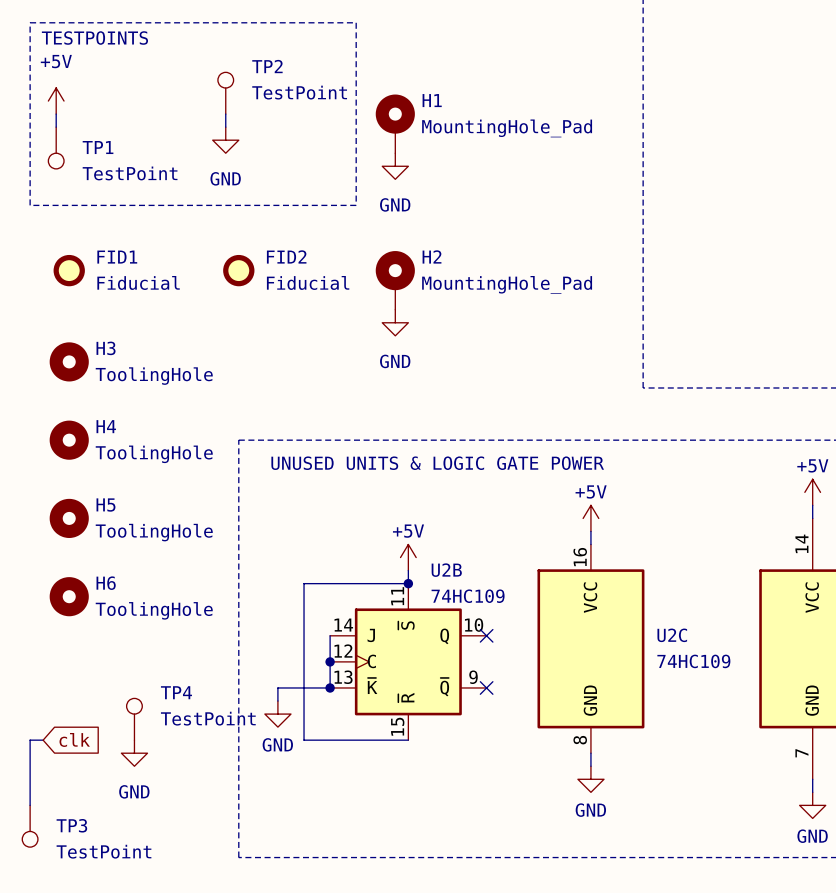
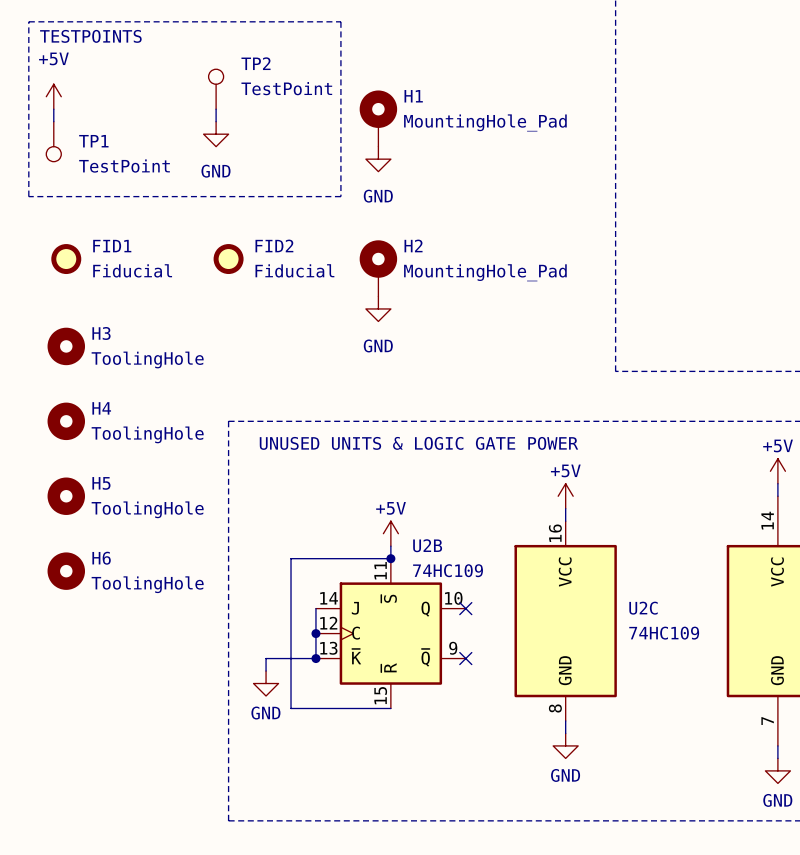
TP4: TestPoint (134, 719) -> none
global label: clk (74, 739) -> none
wire: (43, 740) (30, 740) (30, 805) -> none
power symbol: GND (134, 753) -> none
TP3: TestPoint (30, 826) -> none

